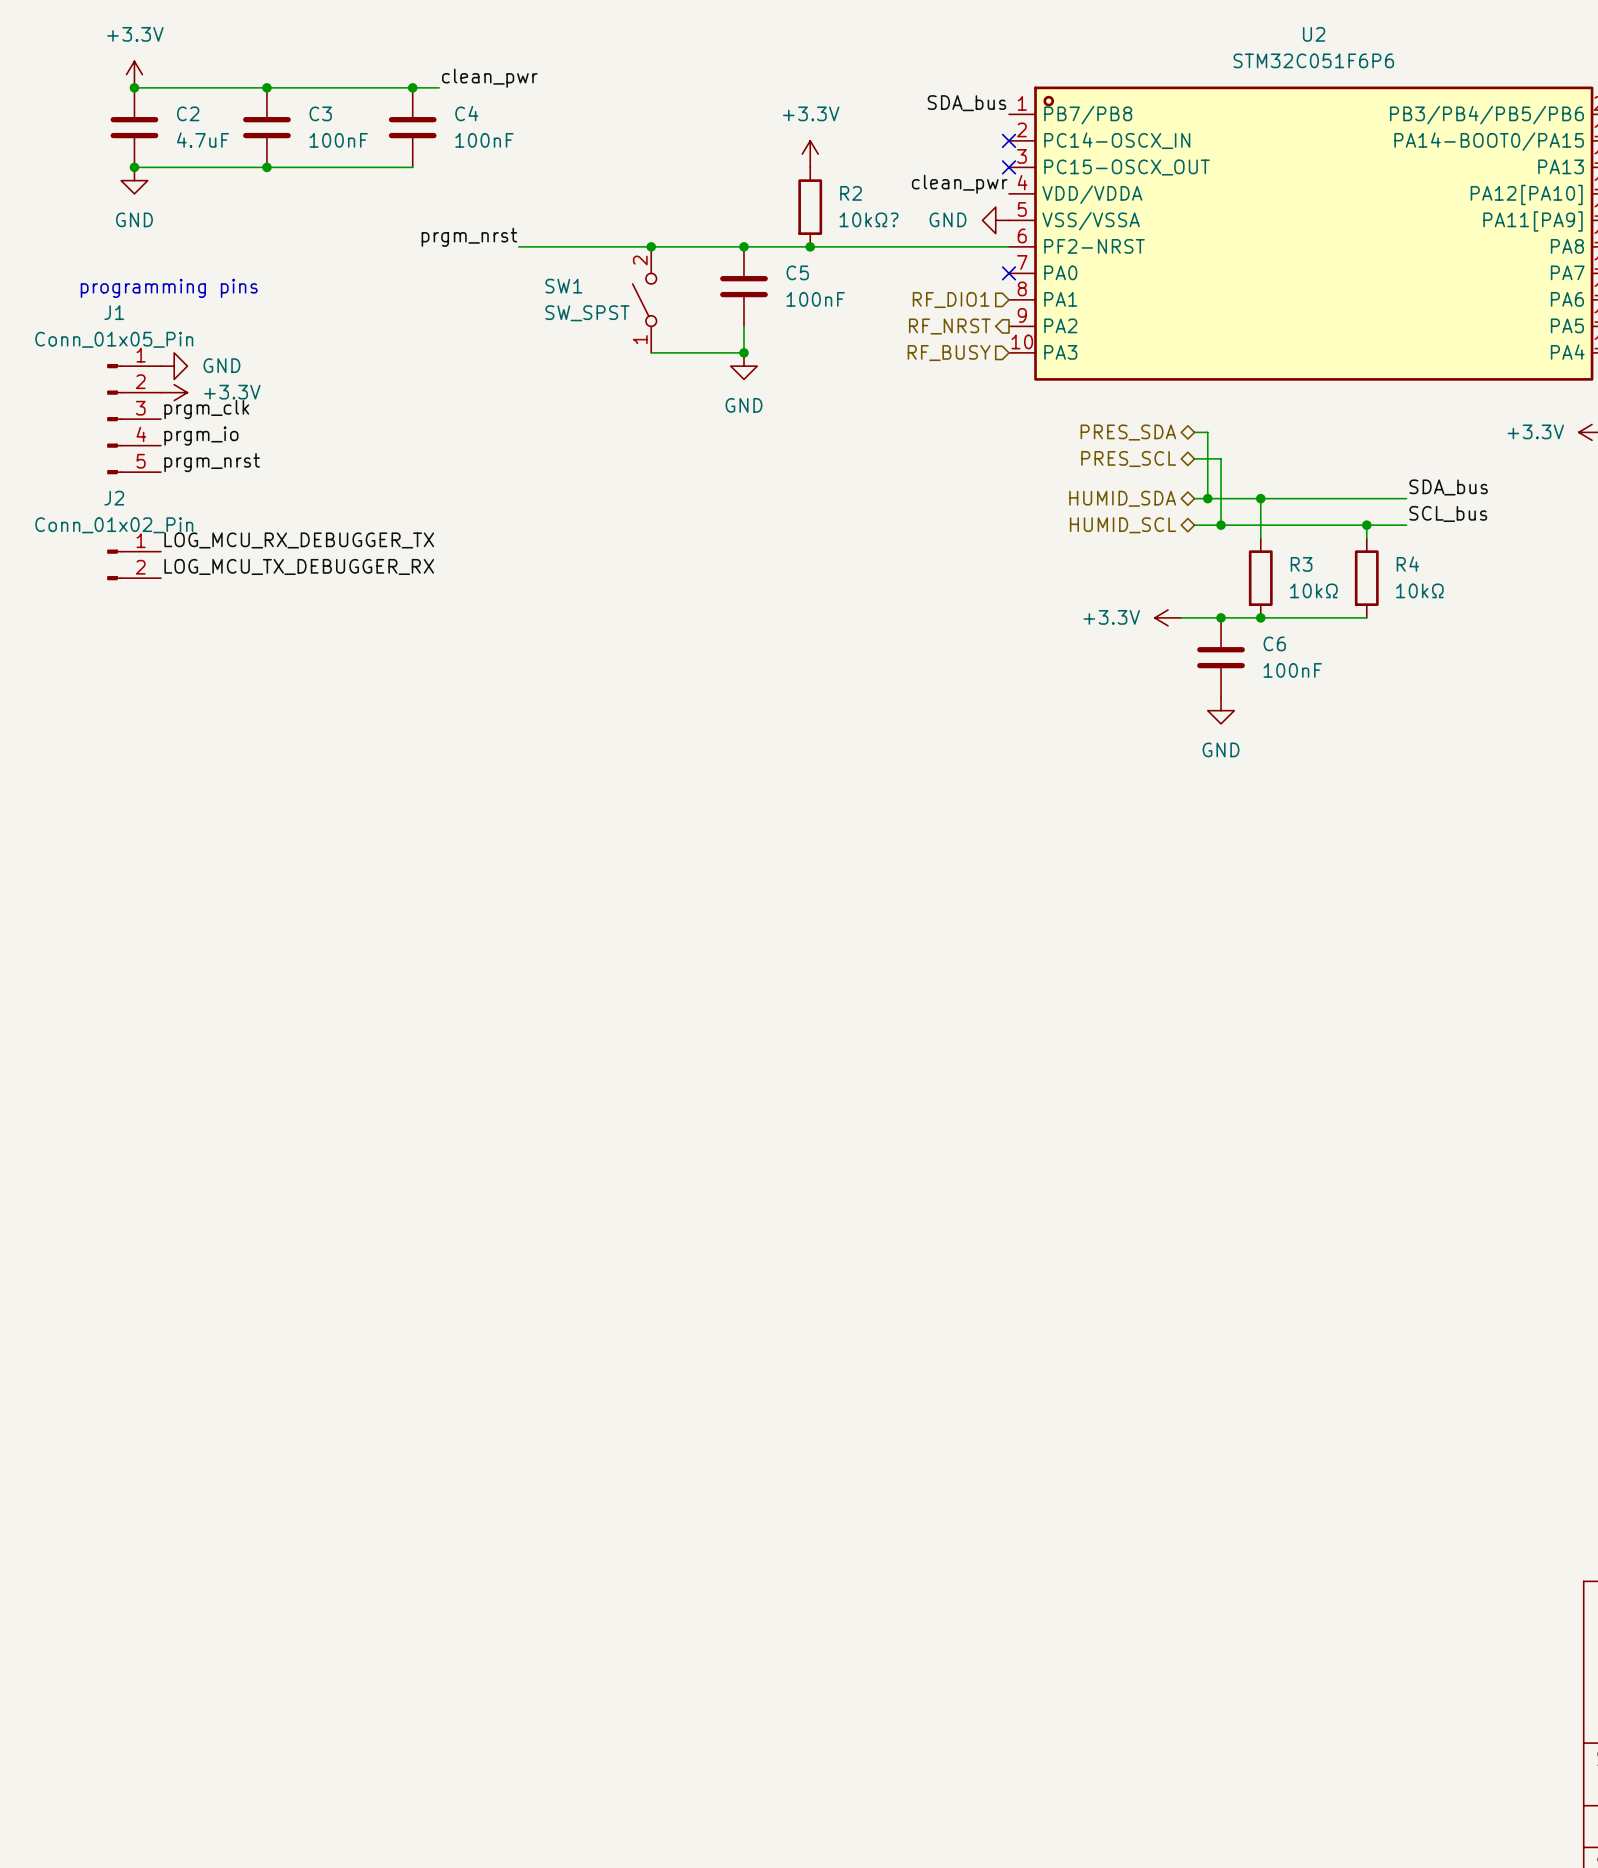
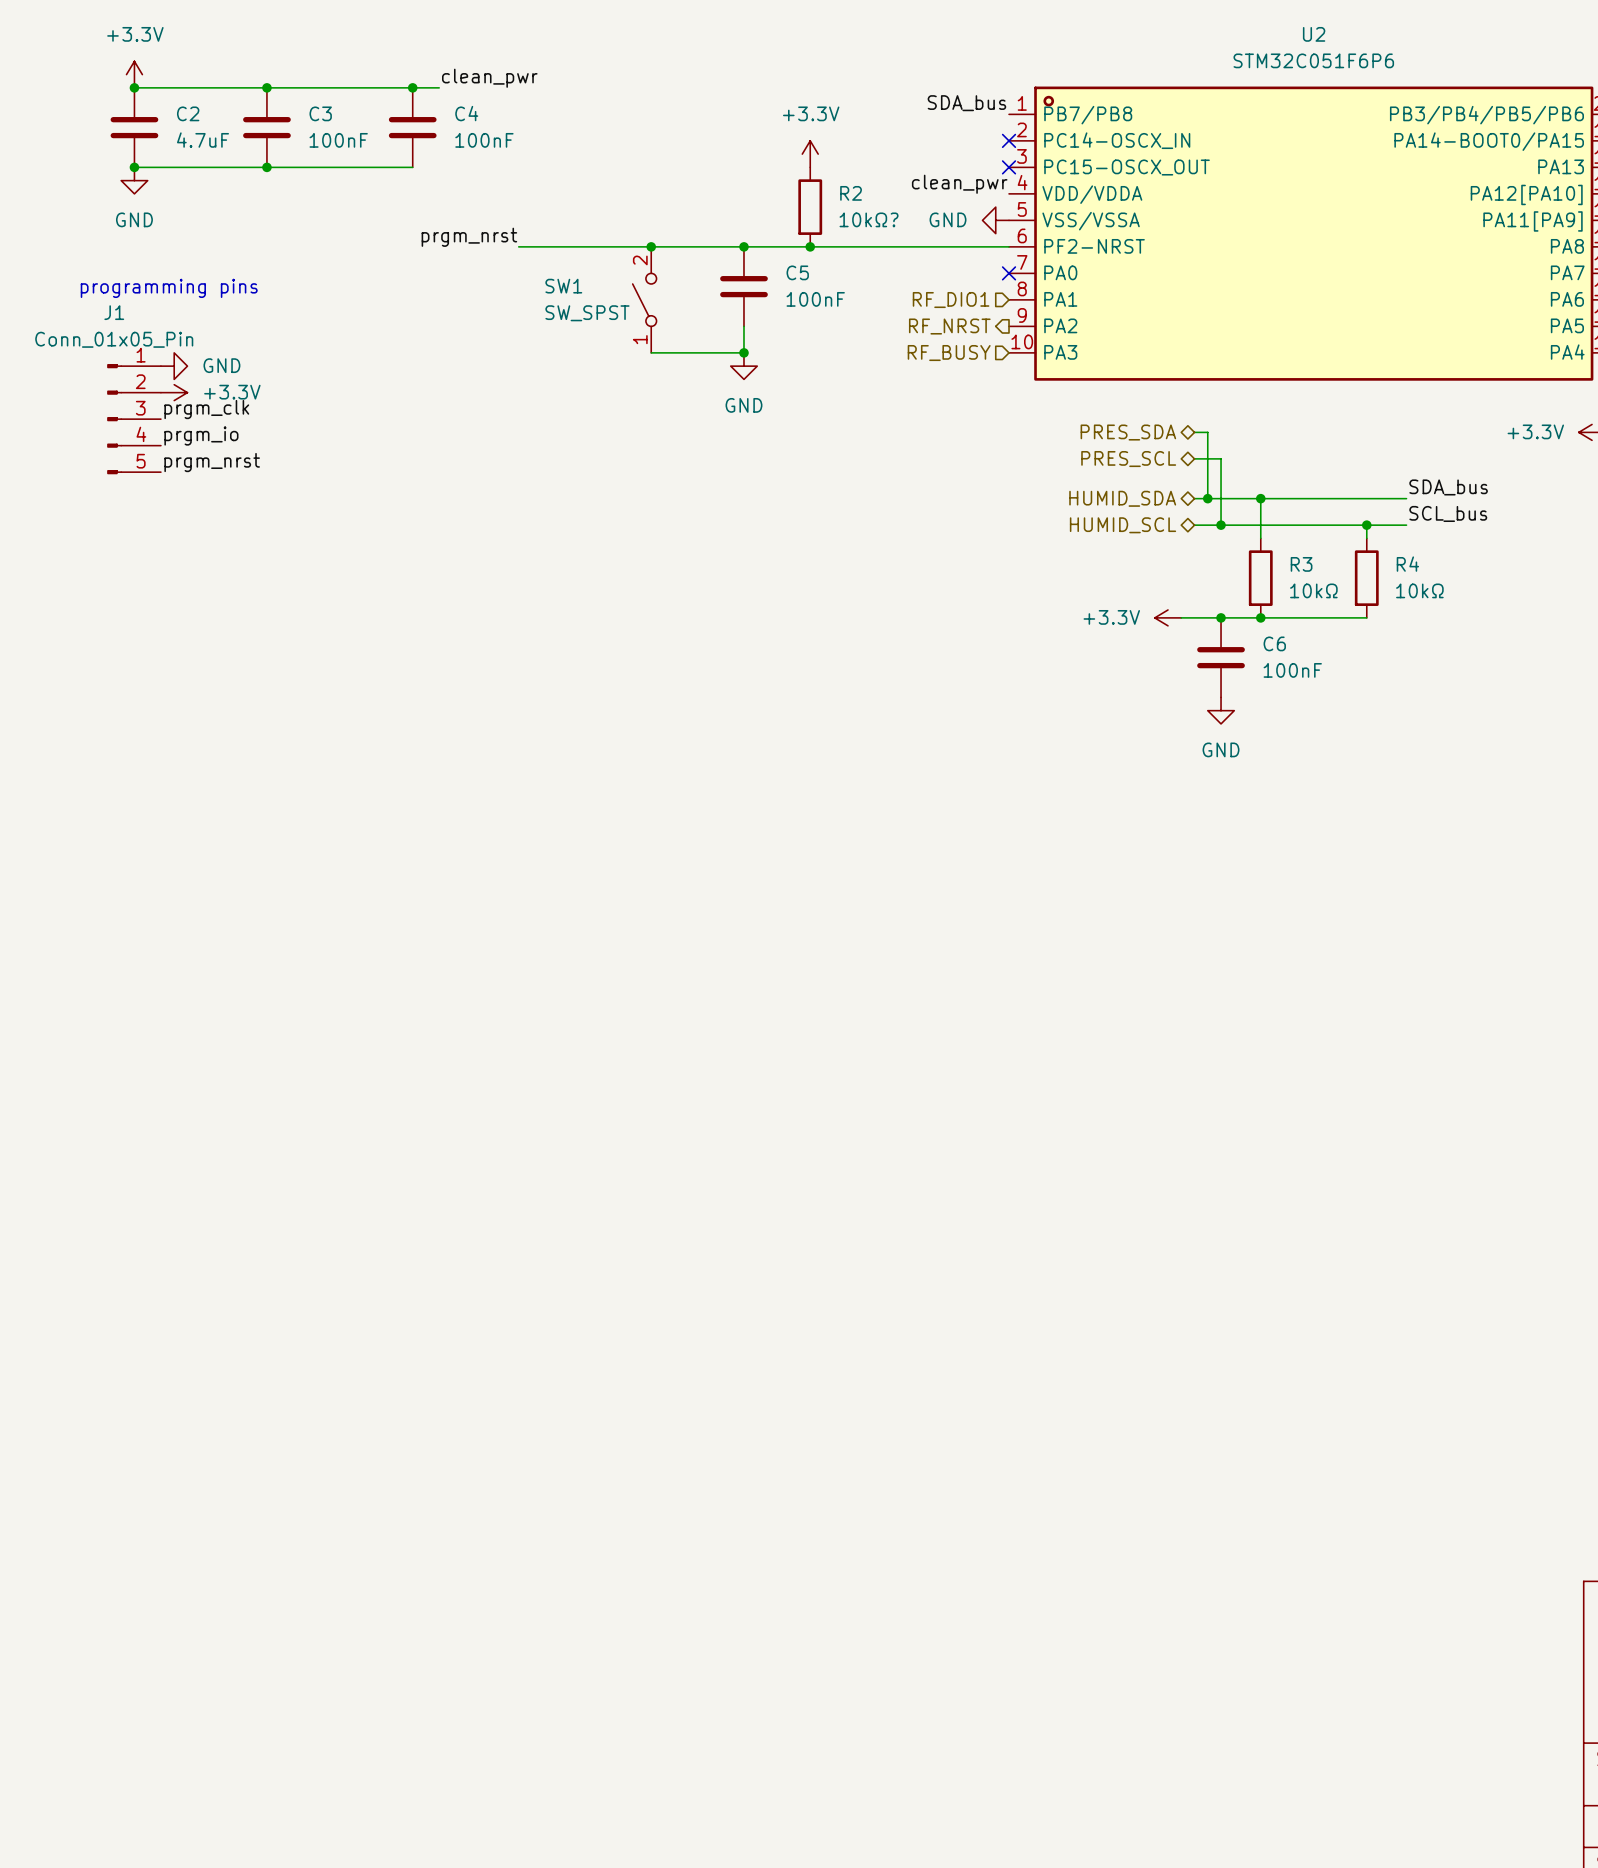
label: LOG_MCU_RX_DEBUGGER_TX (299, 540) -> none
J2: Conn_01x02_Pin (134, 564) -> none
label: LOG_MCU_TX_DEBUGGER_RX (299, 566) -> none

